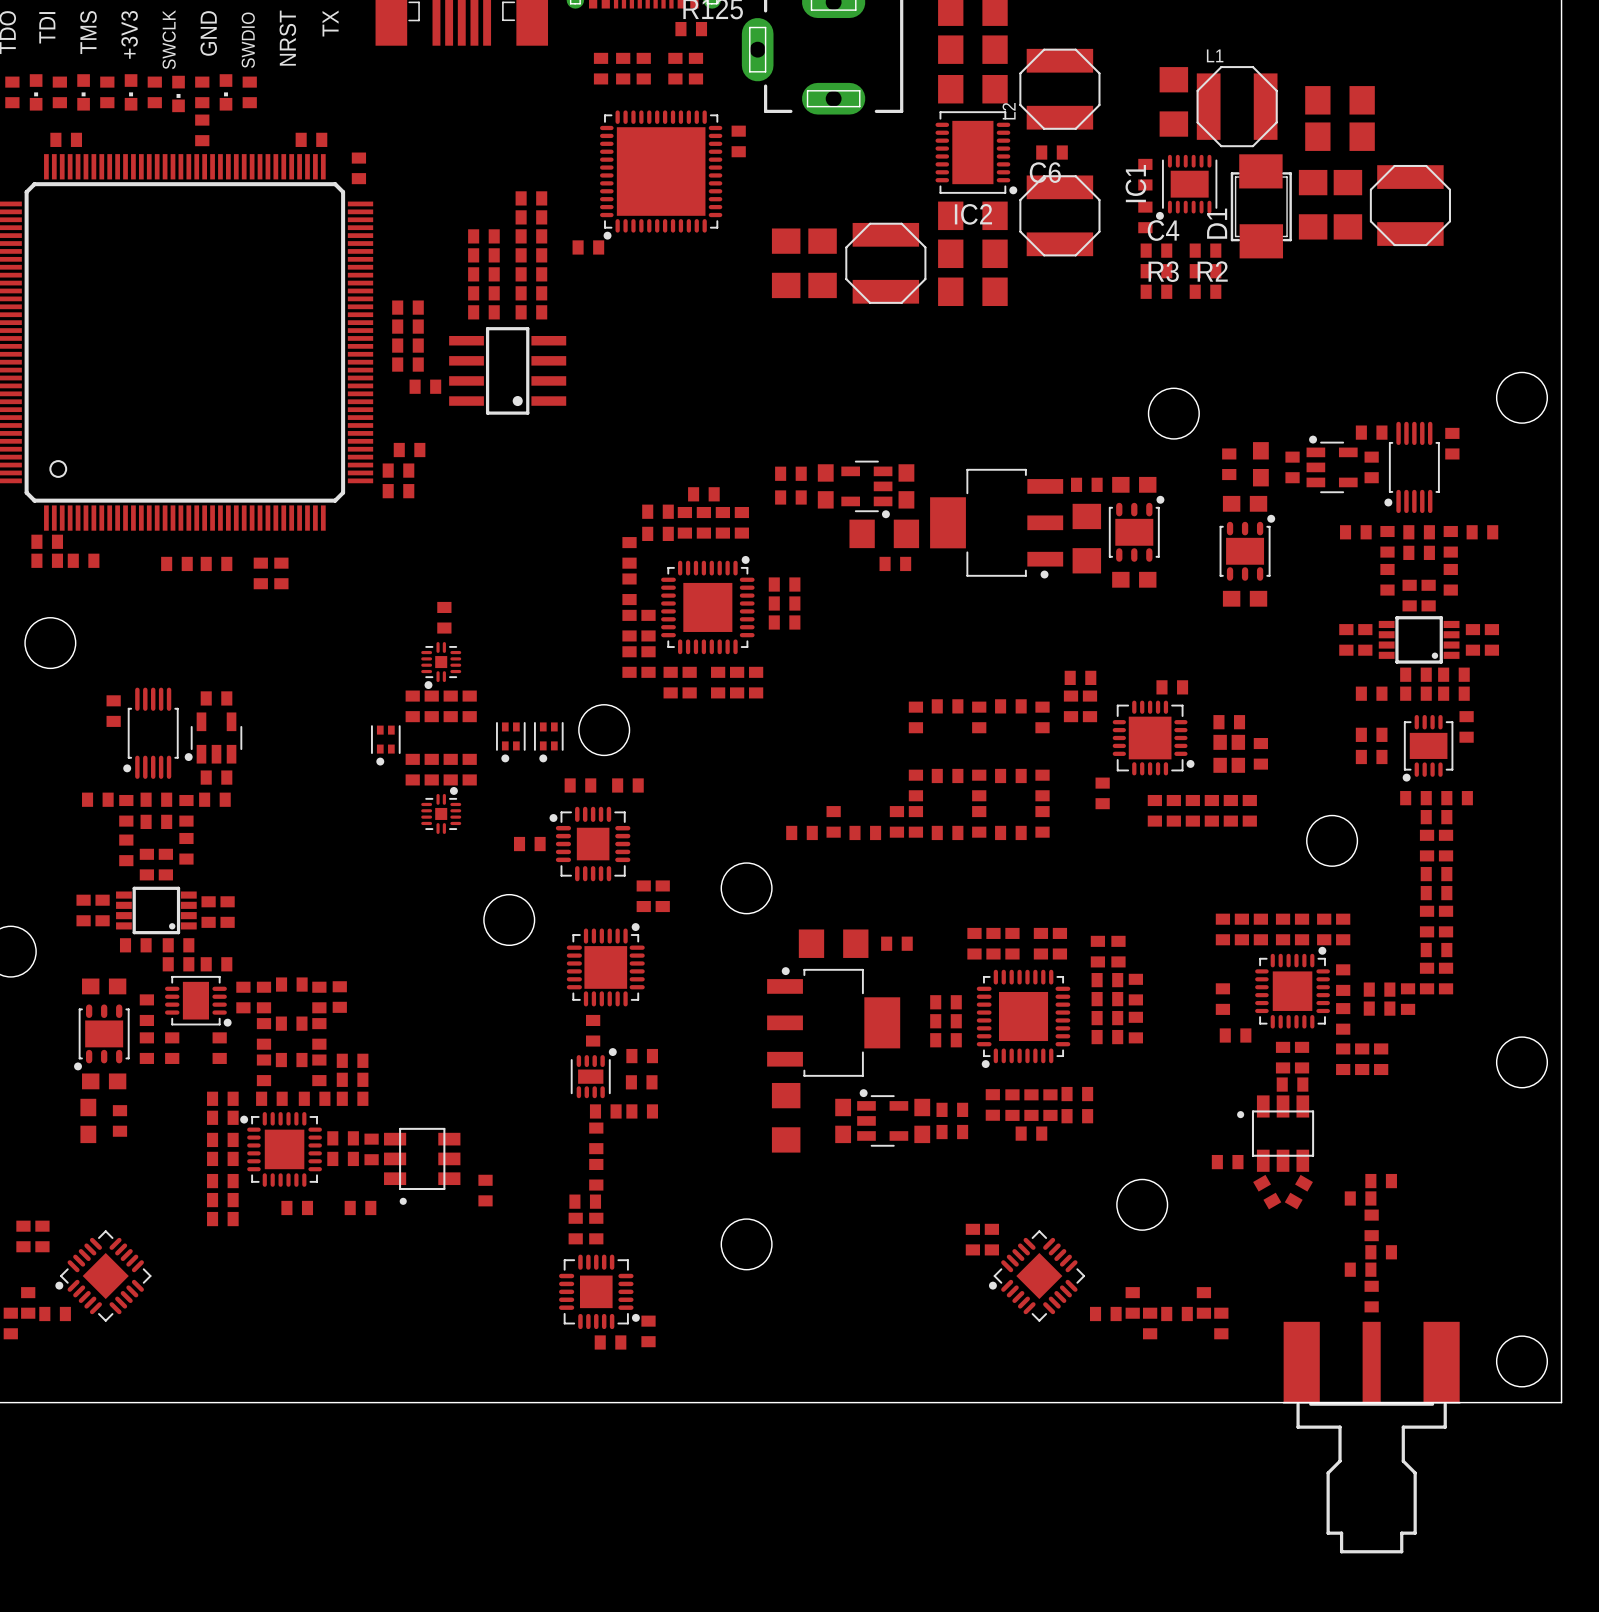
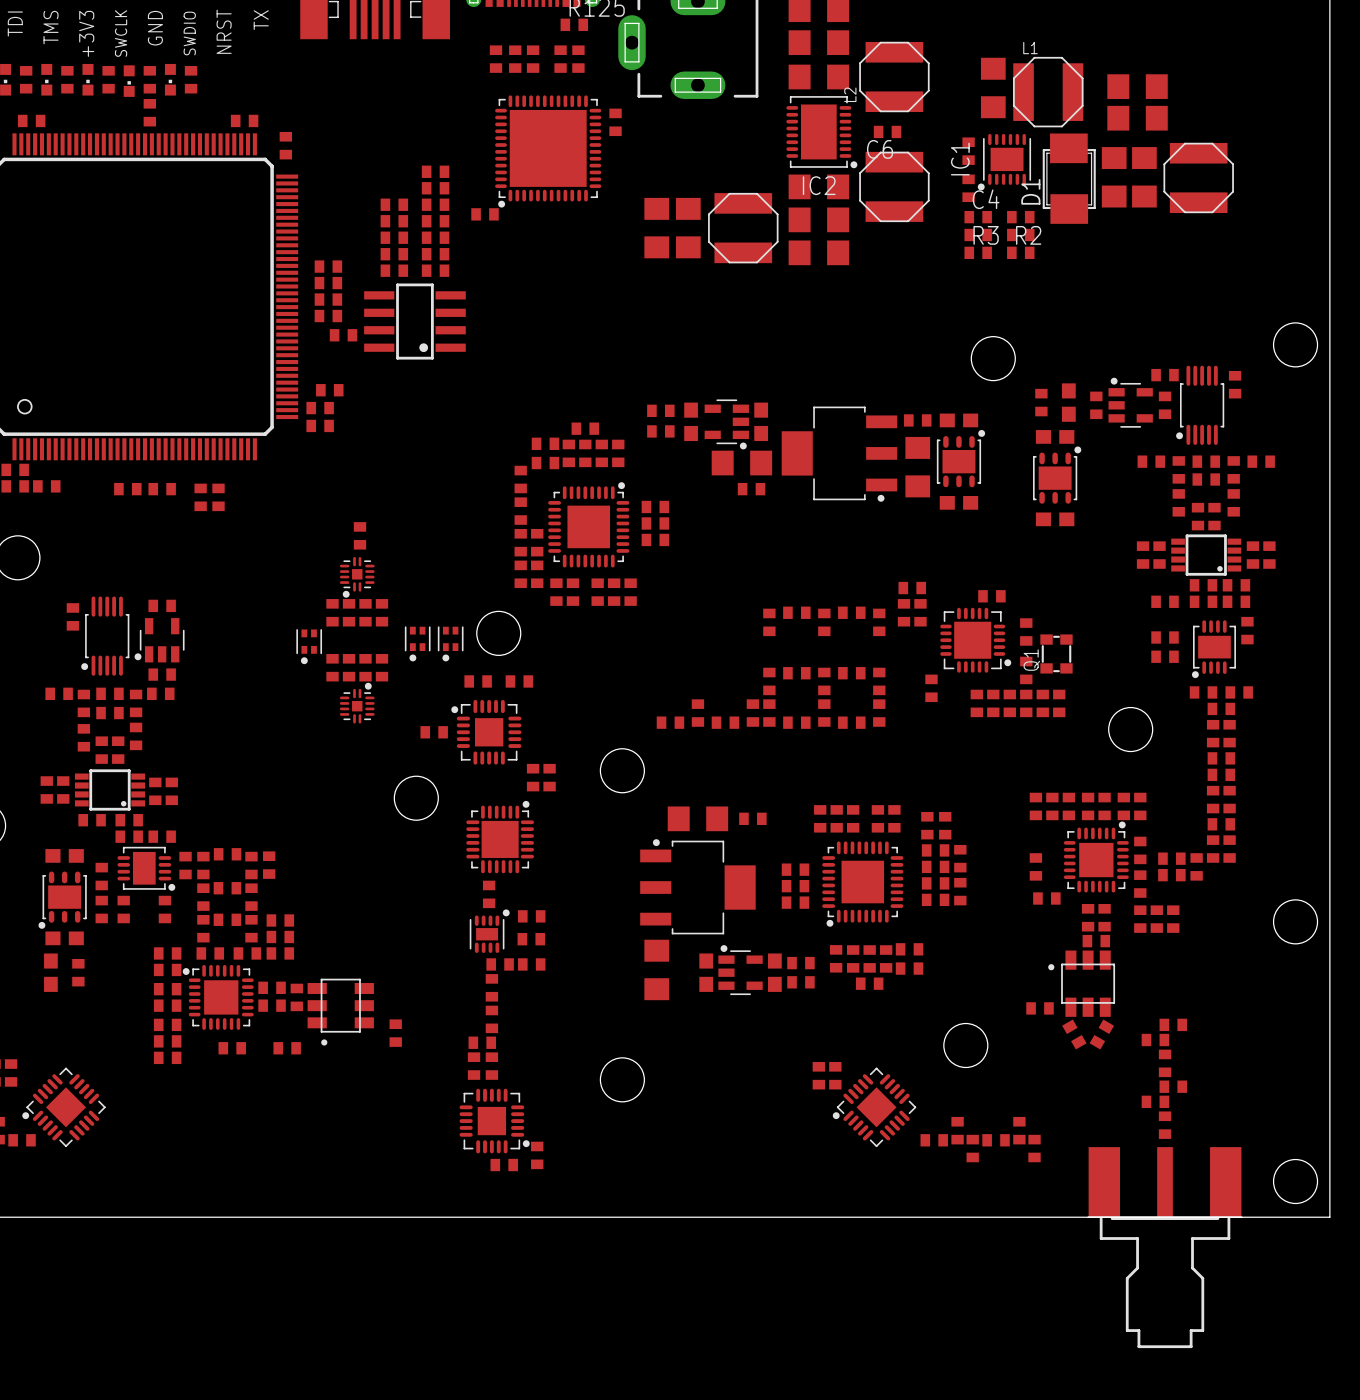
part rotation: 0° (1229, 722) -> 90° clockwise (1026, 632)
part: (1229, 753) -> none
Q1: none -> (1056, 653)
part: (1260, 753) -> none
part: none -> (1026, 670)

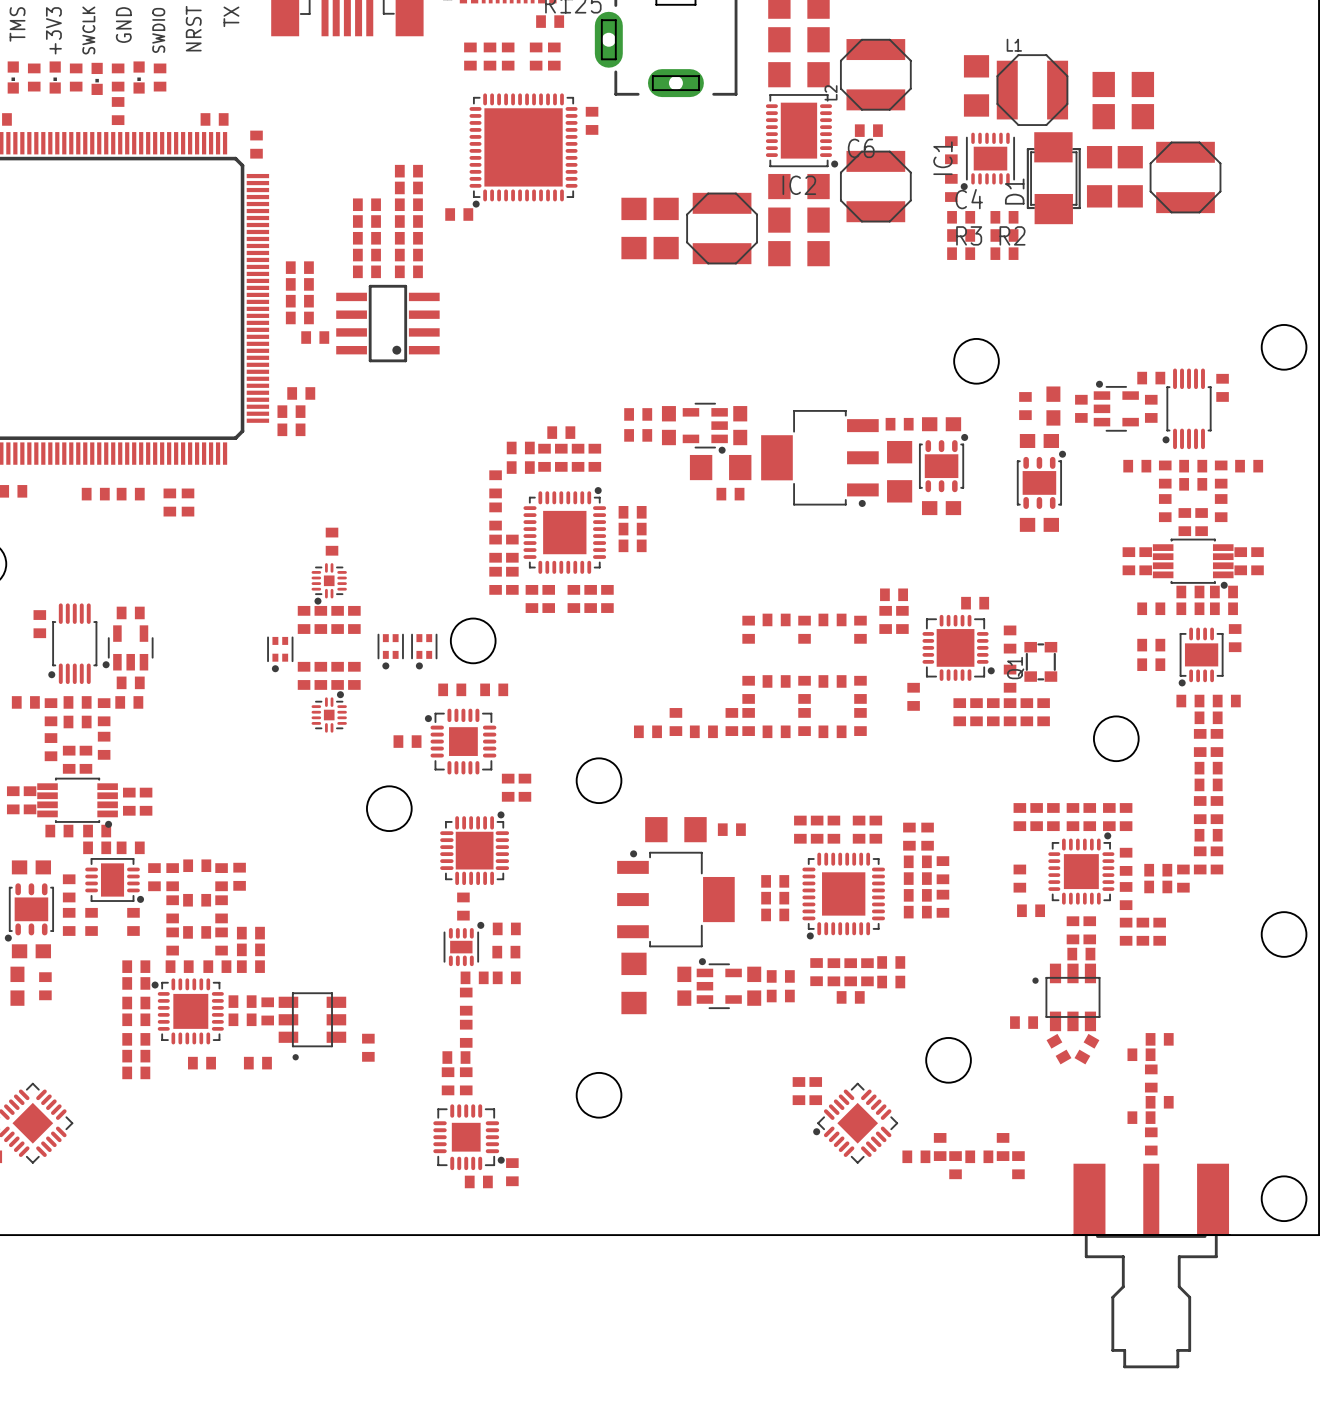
part footprint: [1171, 534, 1242, 576] -> [1152, 538, 1234, 589]
part footprint: [74, 769, 146, 811] -> [37, 777, 118, 828]
part: (155, 791) -> none
part: none -> (129, 801)
part: (171, 791) -> none
part: none -> (146, 801)

